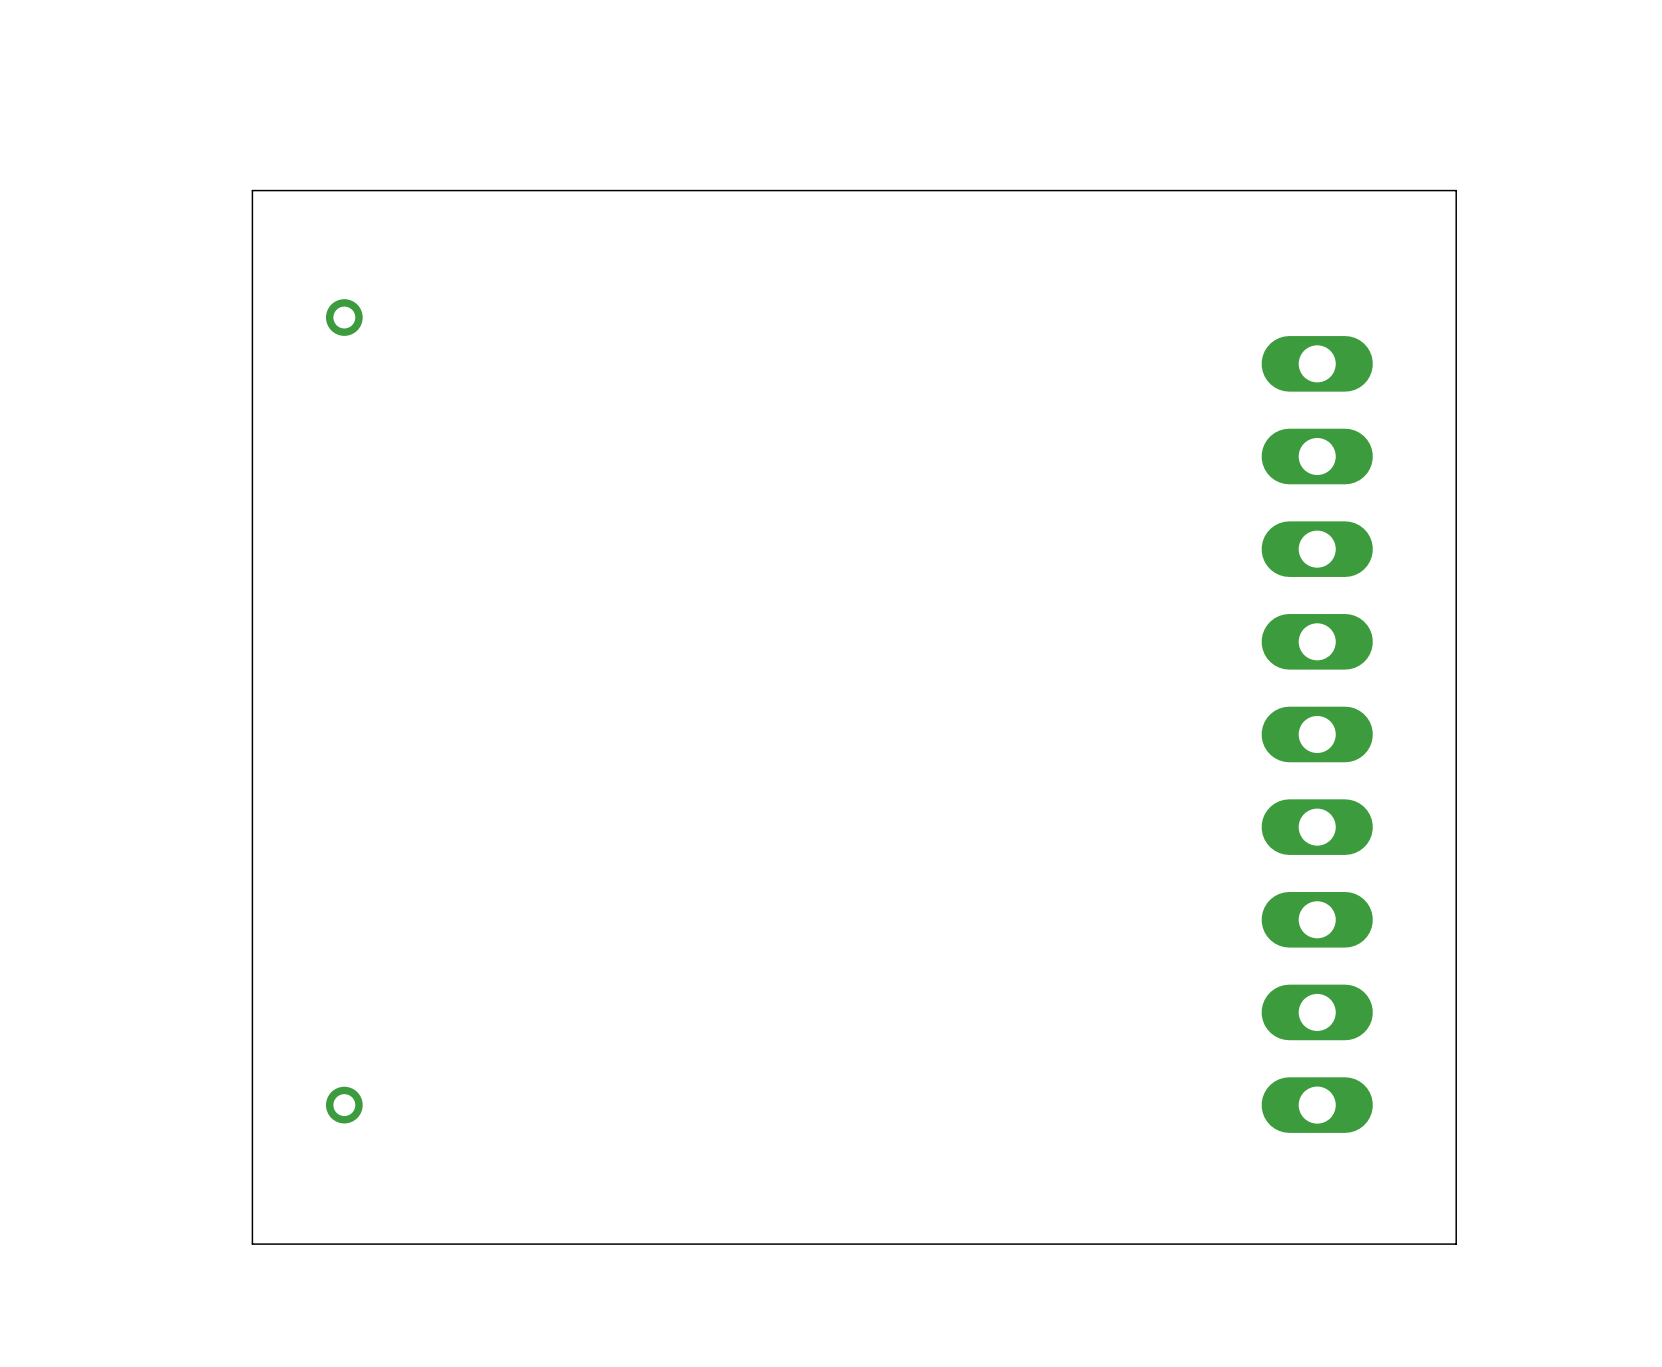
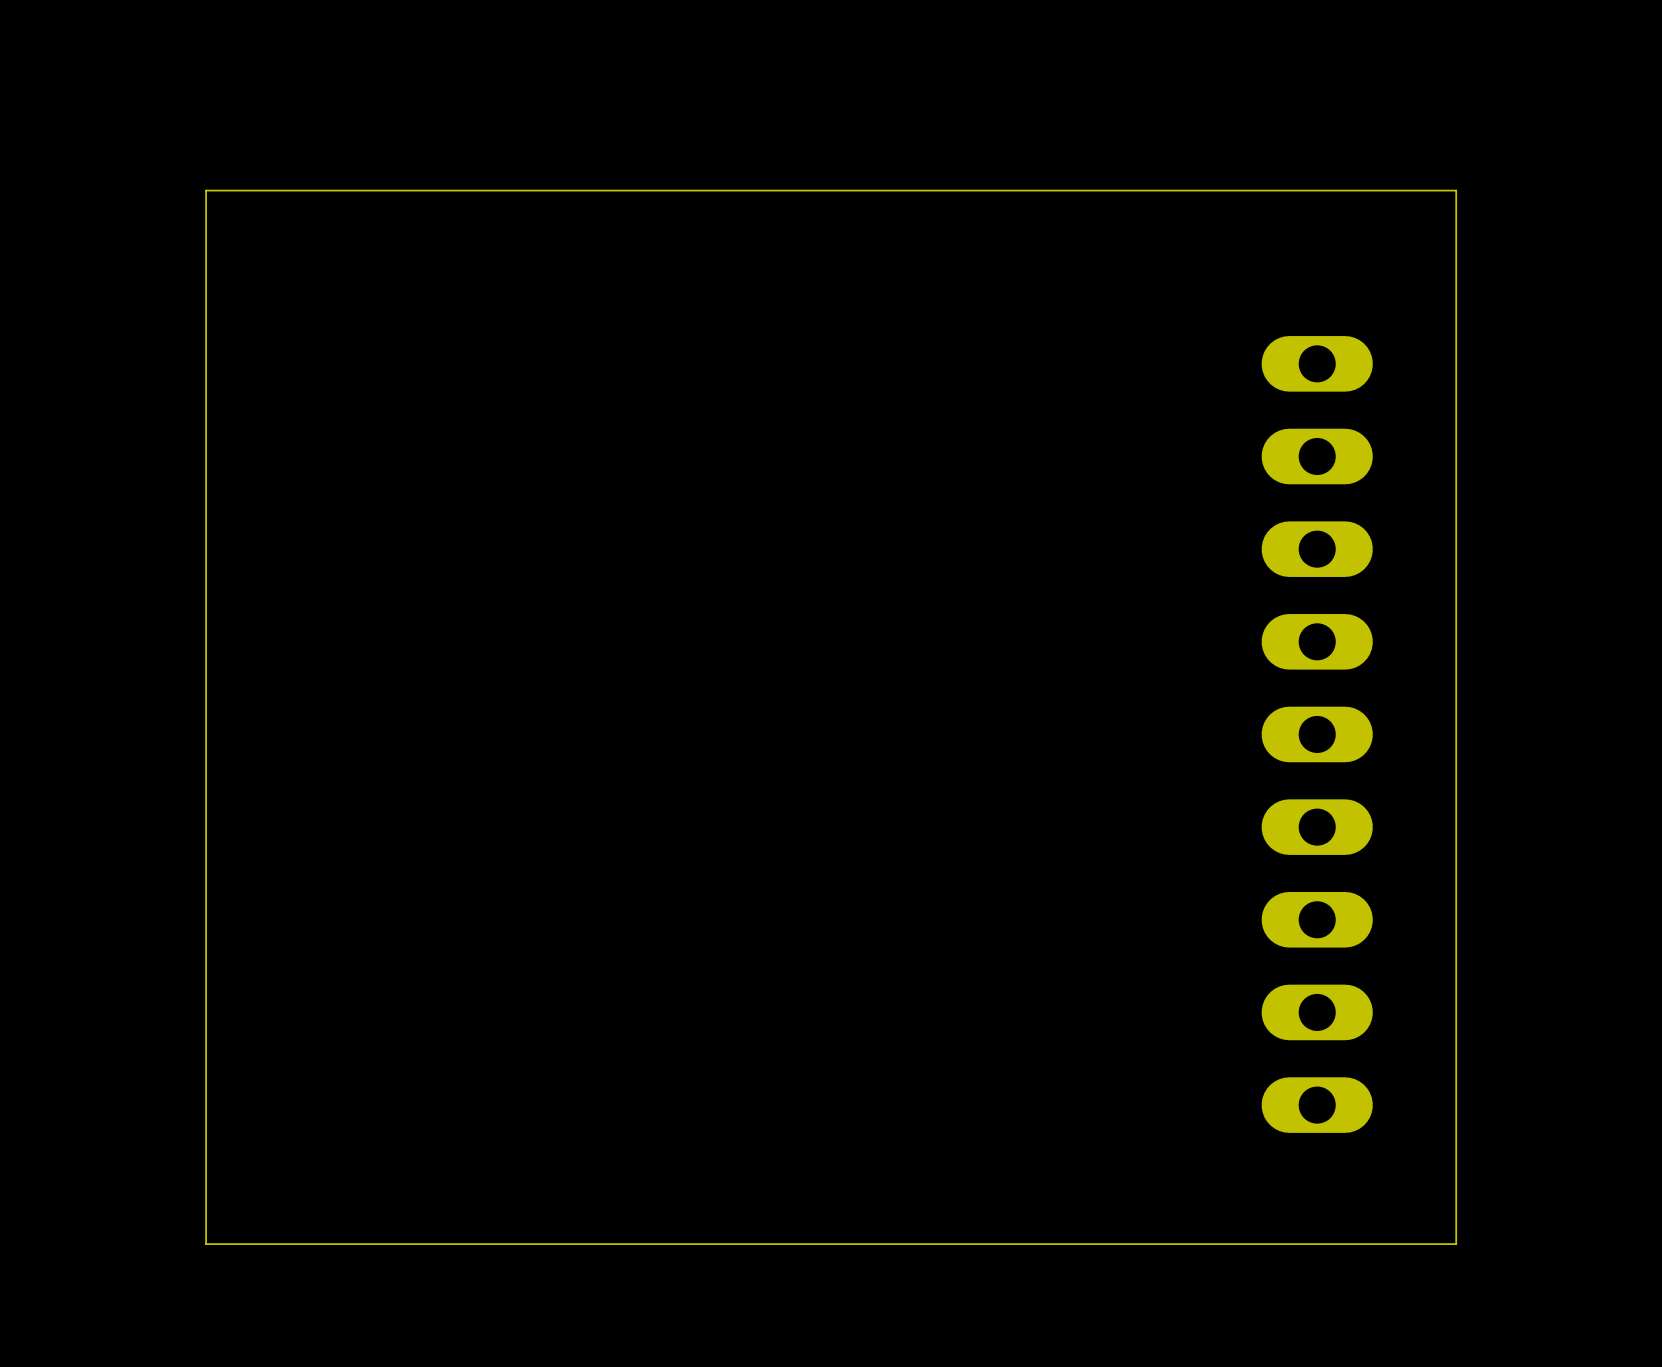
board edge: (252, 190) (252, 1244) -> (252, 190) (206, 190) (206, 1244) (252, 1244)
via: (344, 317) -> none
via: (344, 1105) -> none

